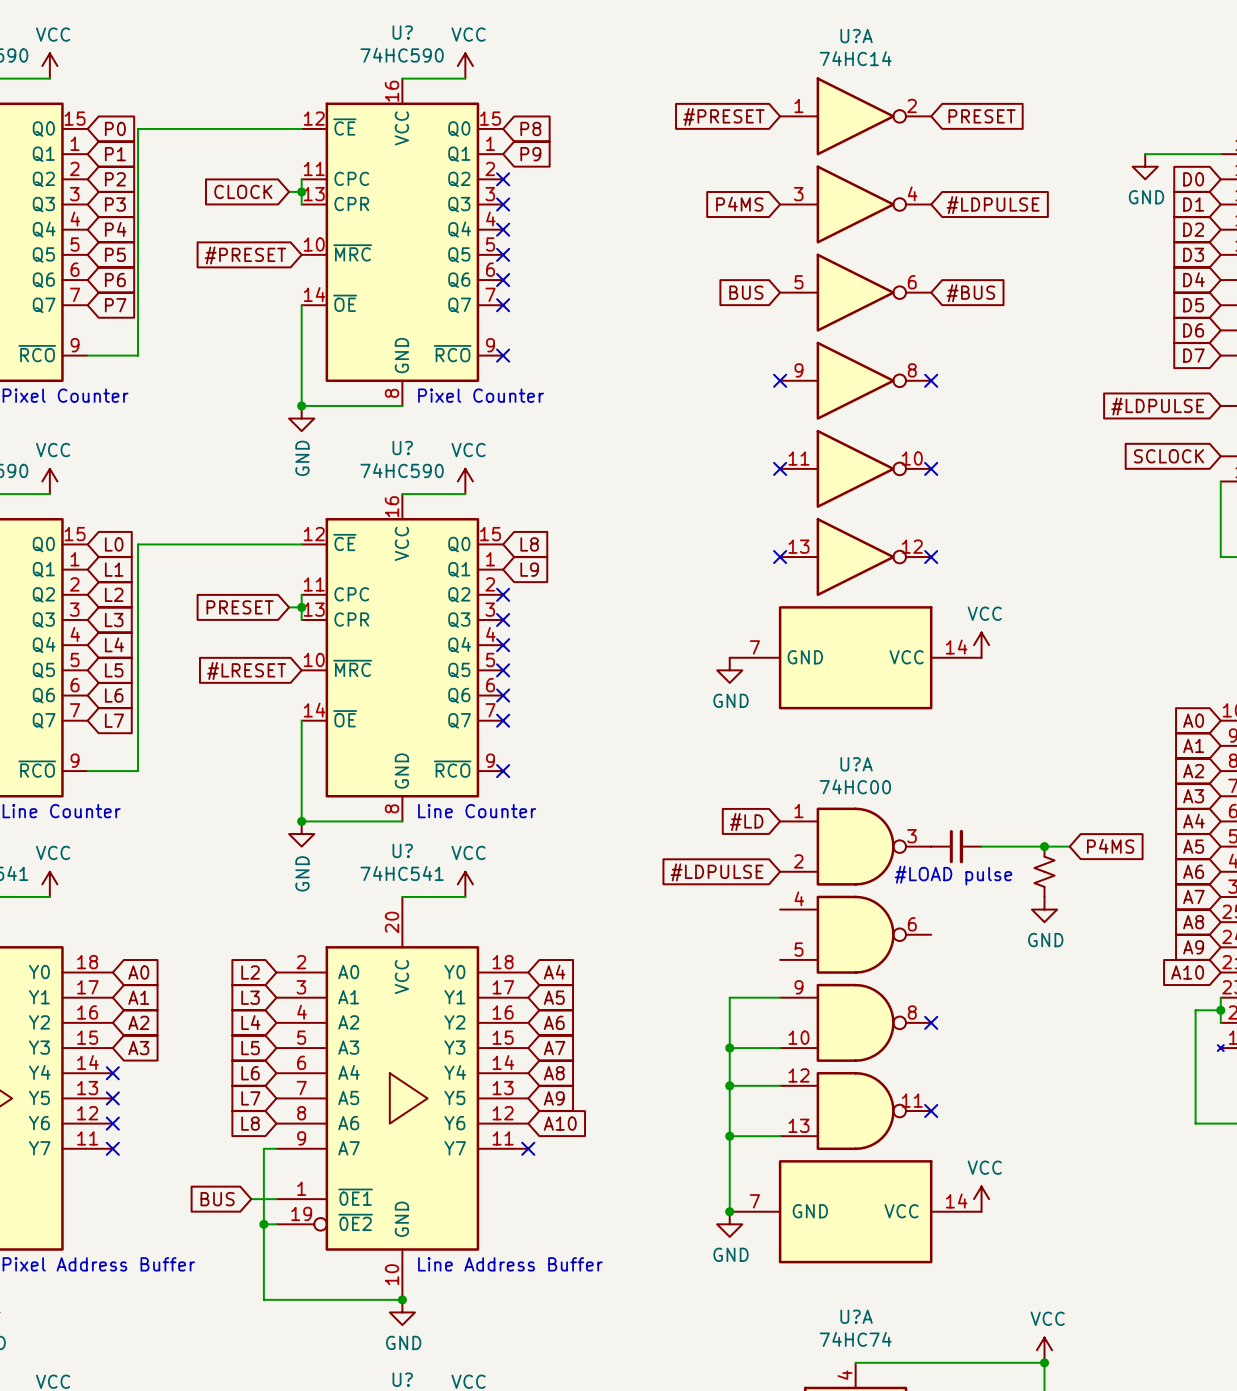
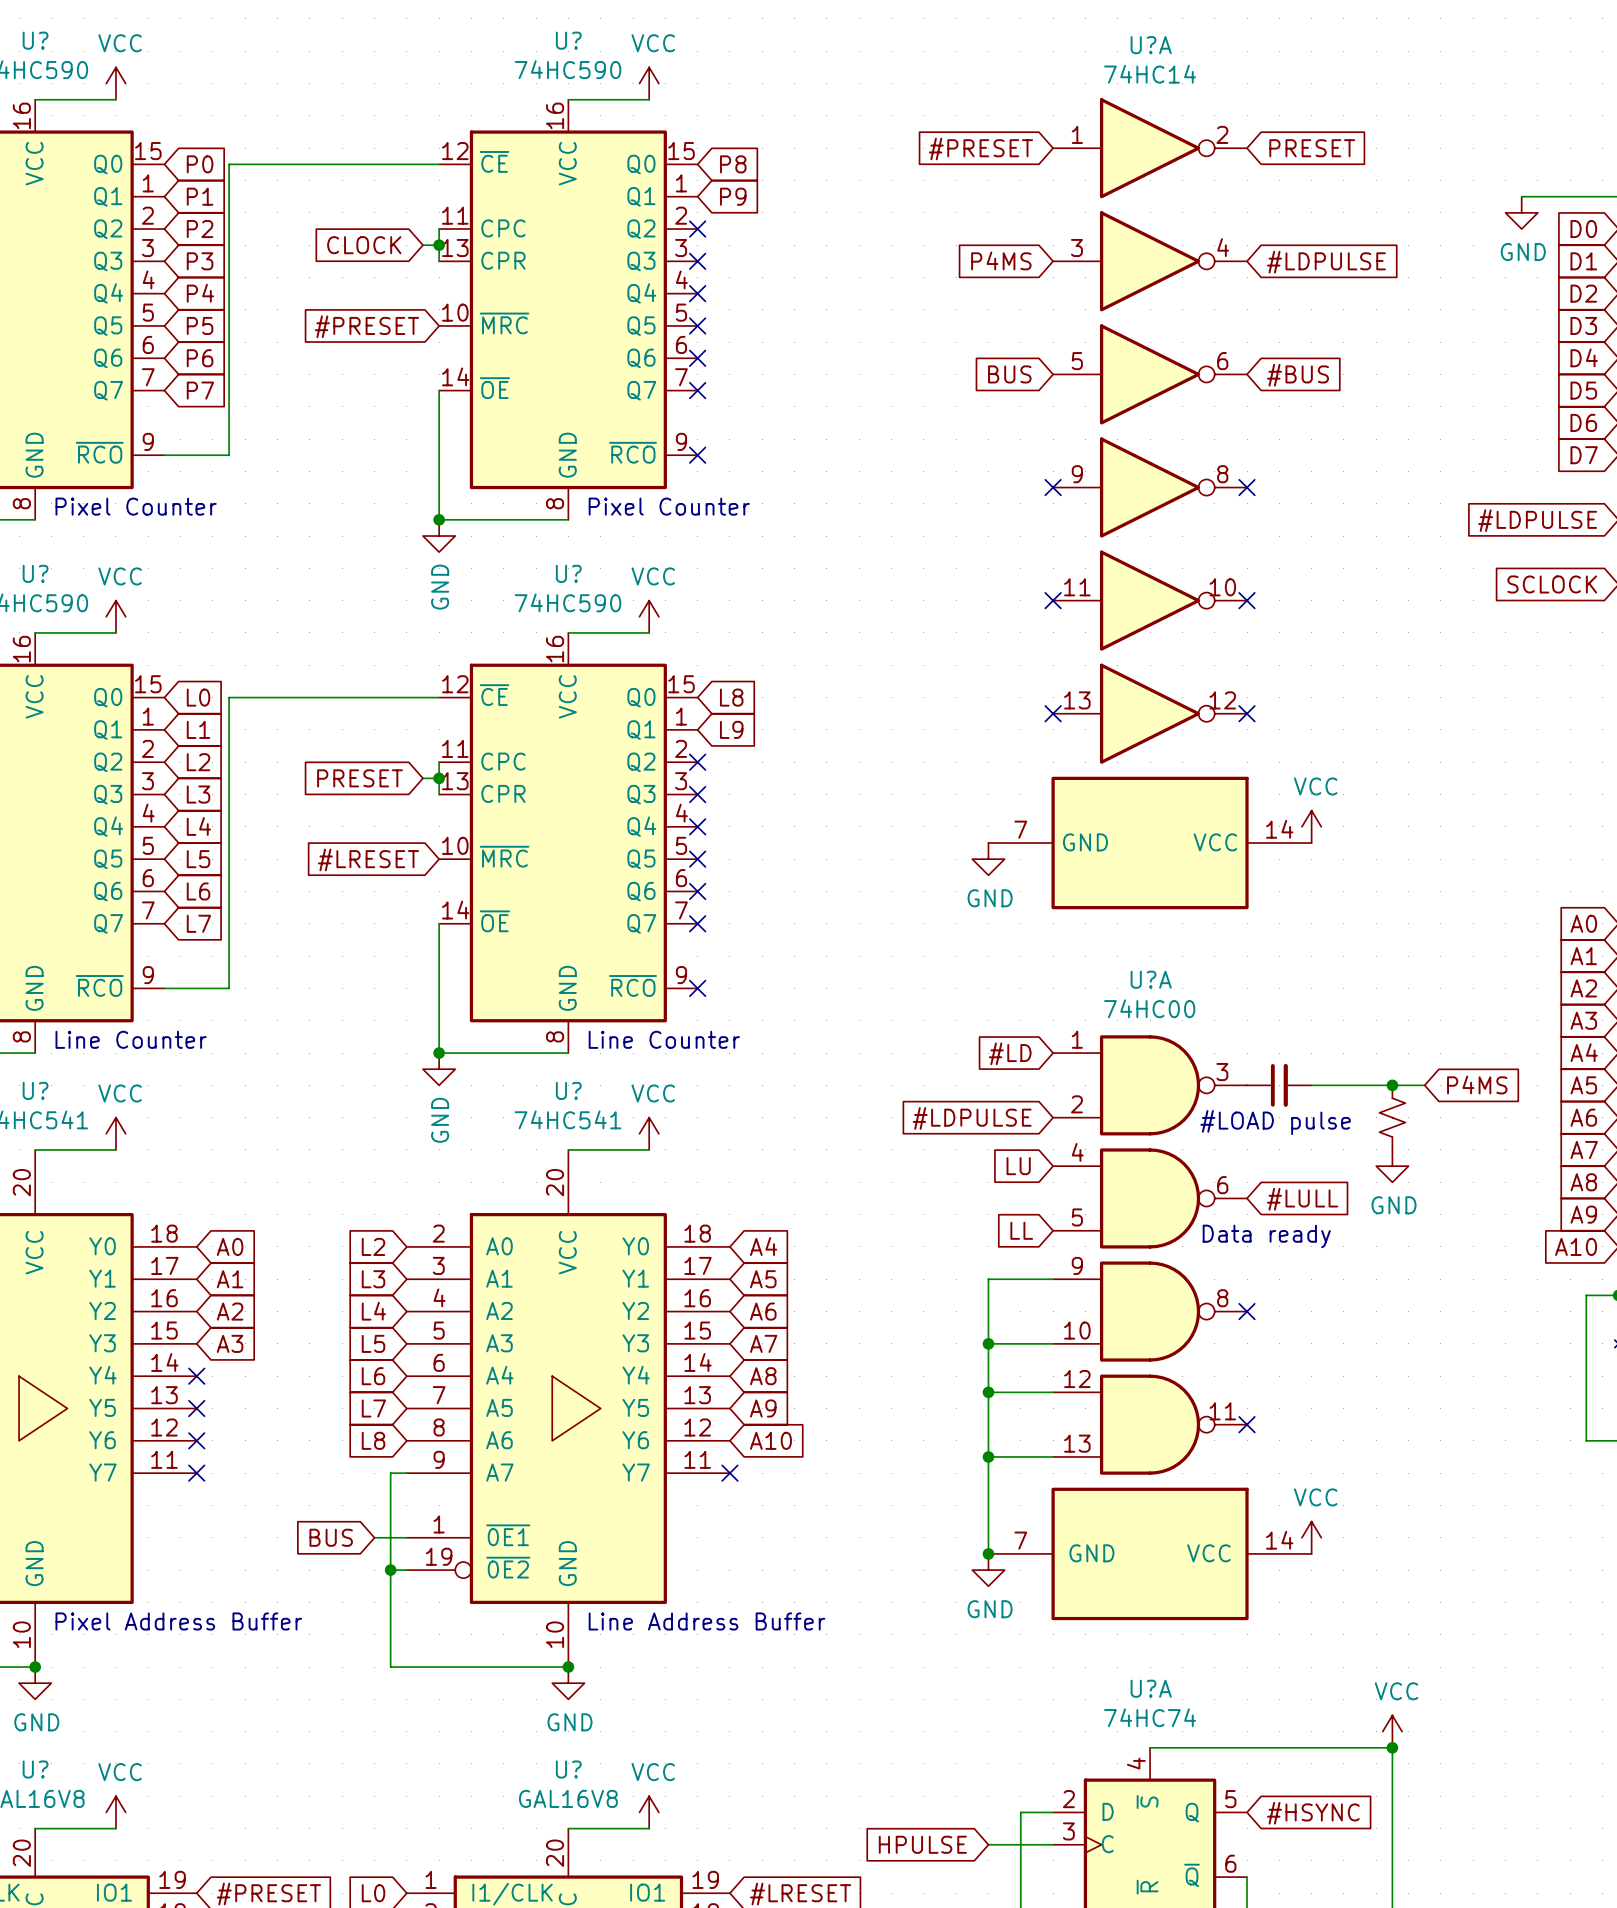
global label: none -> LU (1018, 1166)
global label: none -> #LULL (1302, 1199)
global label: none -> LL (1021, 1230)
text: none -> Data ready (1266, 1236)

